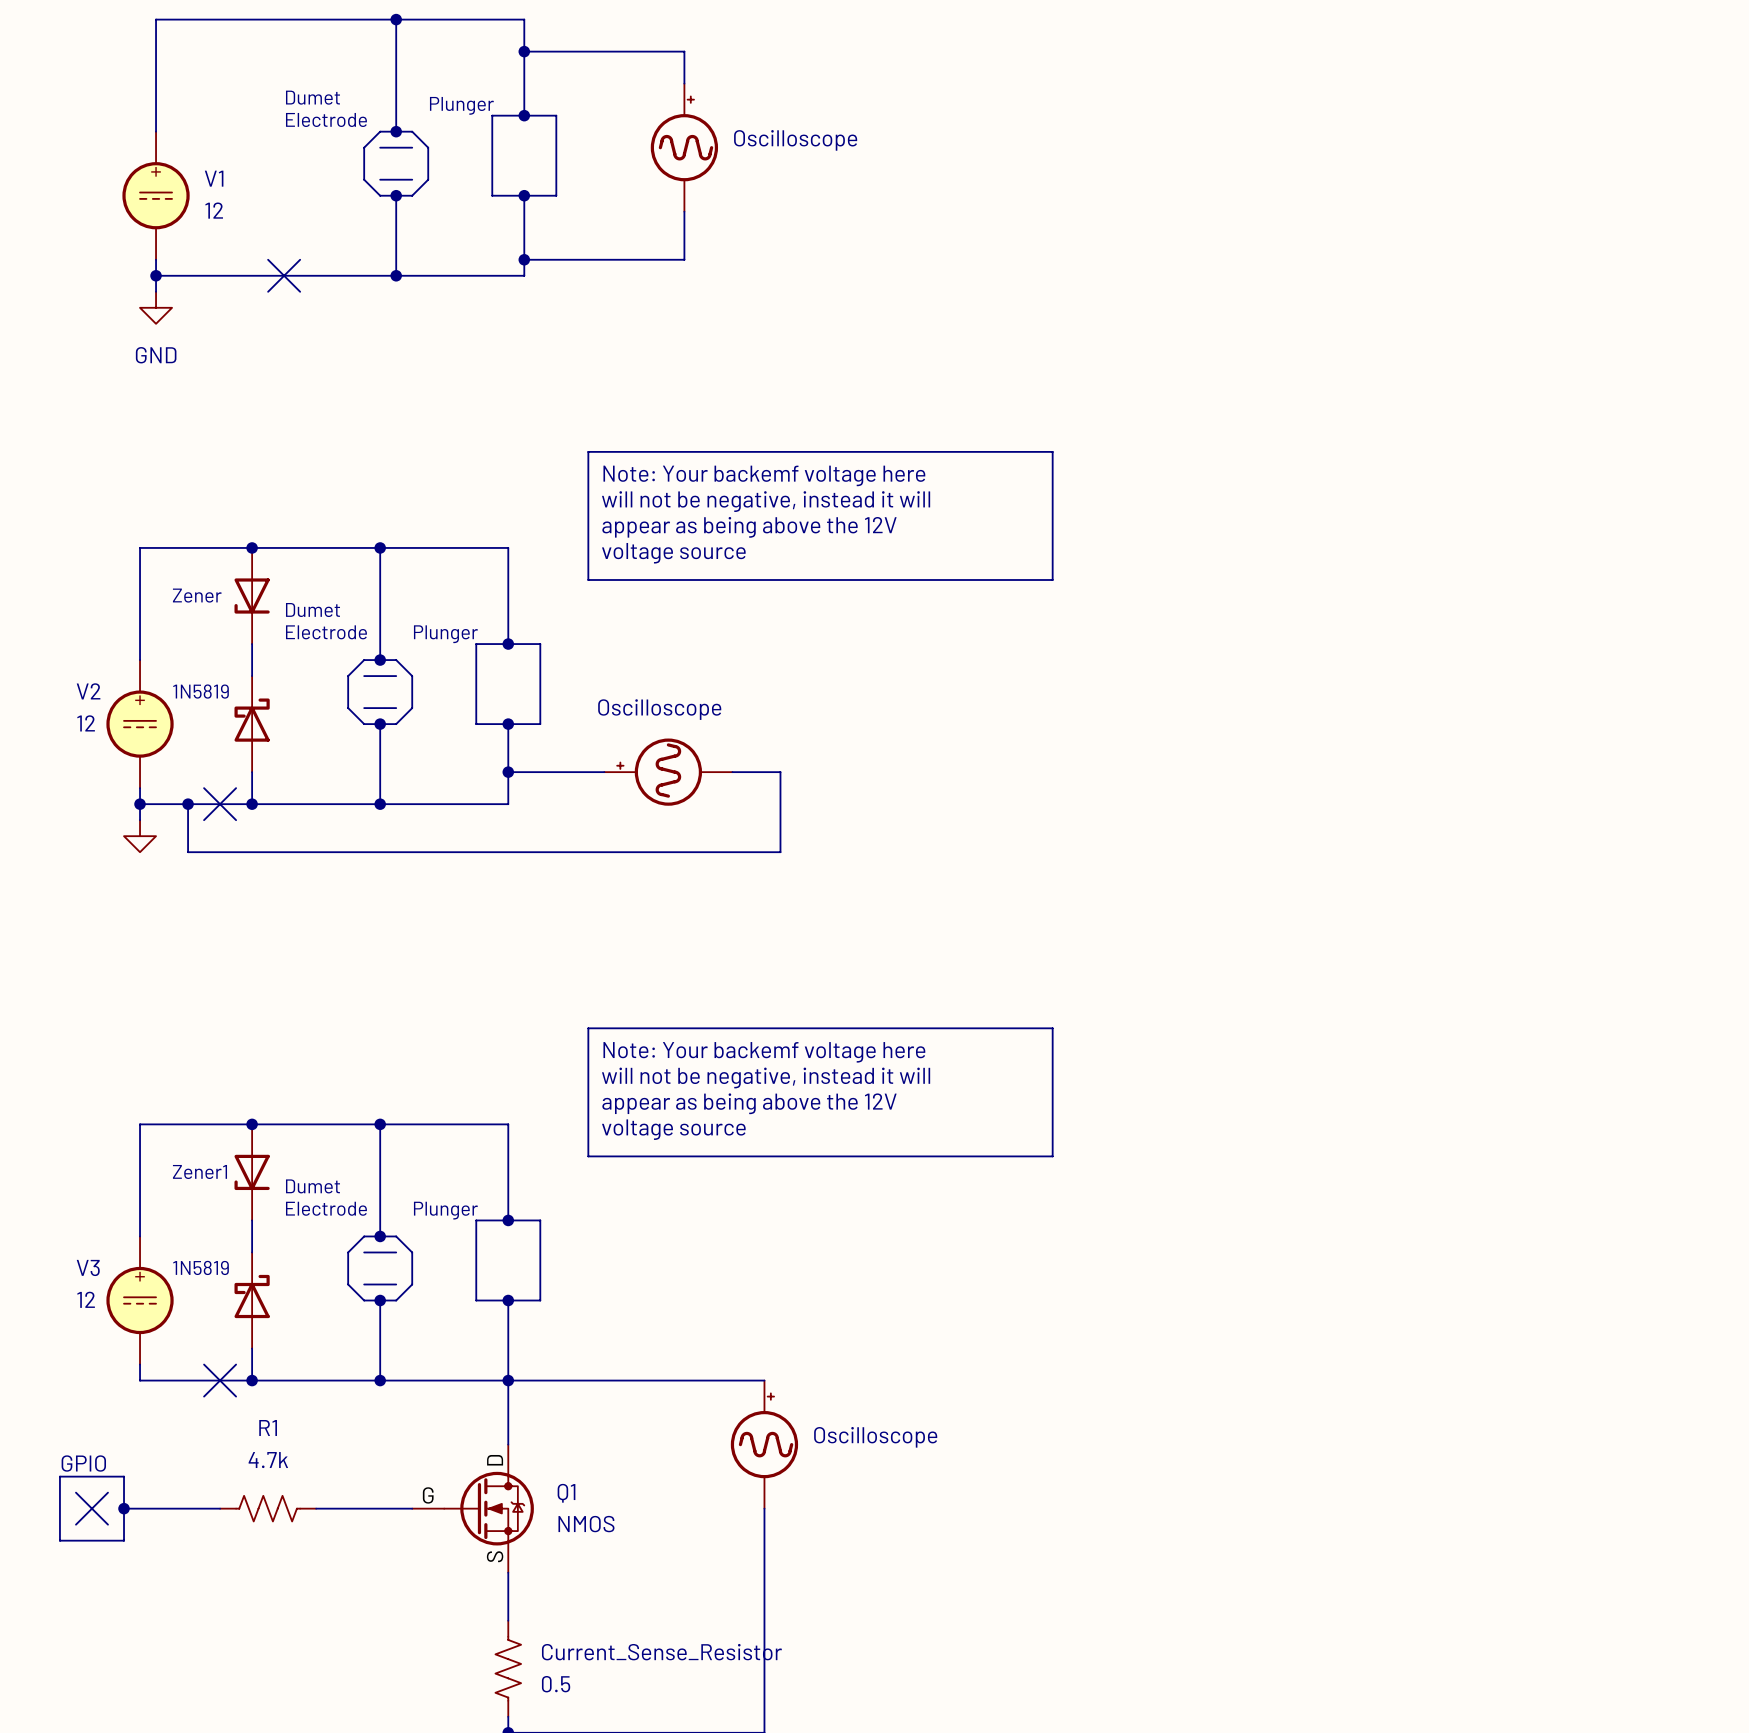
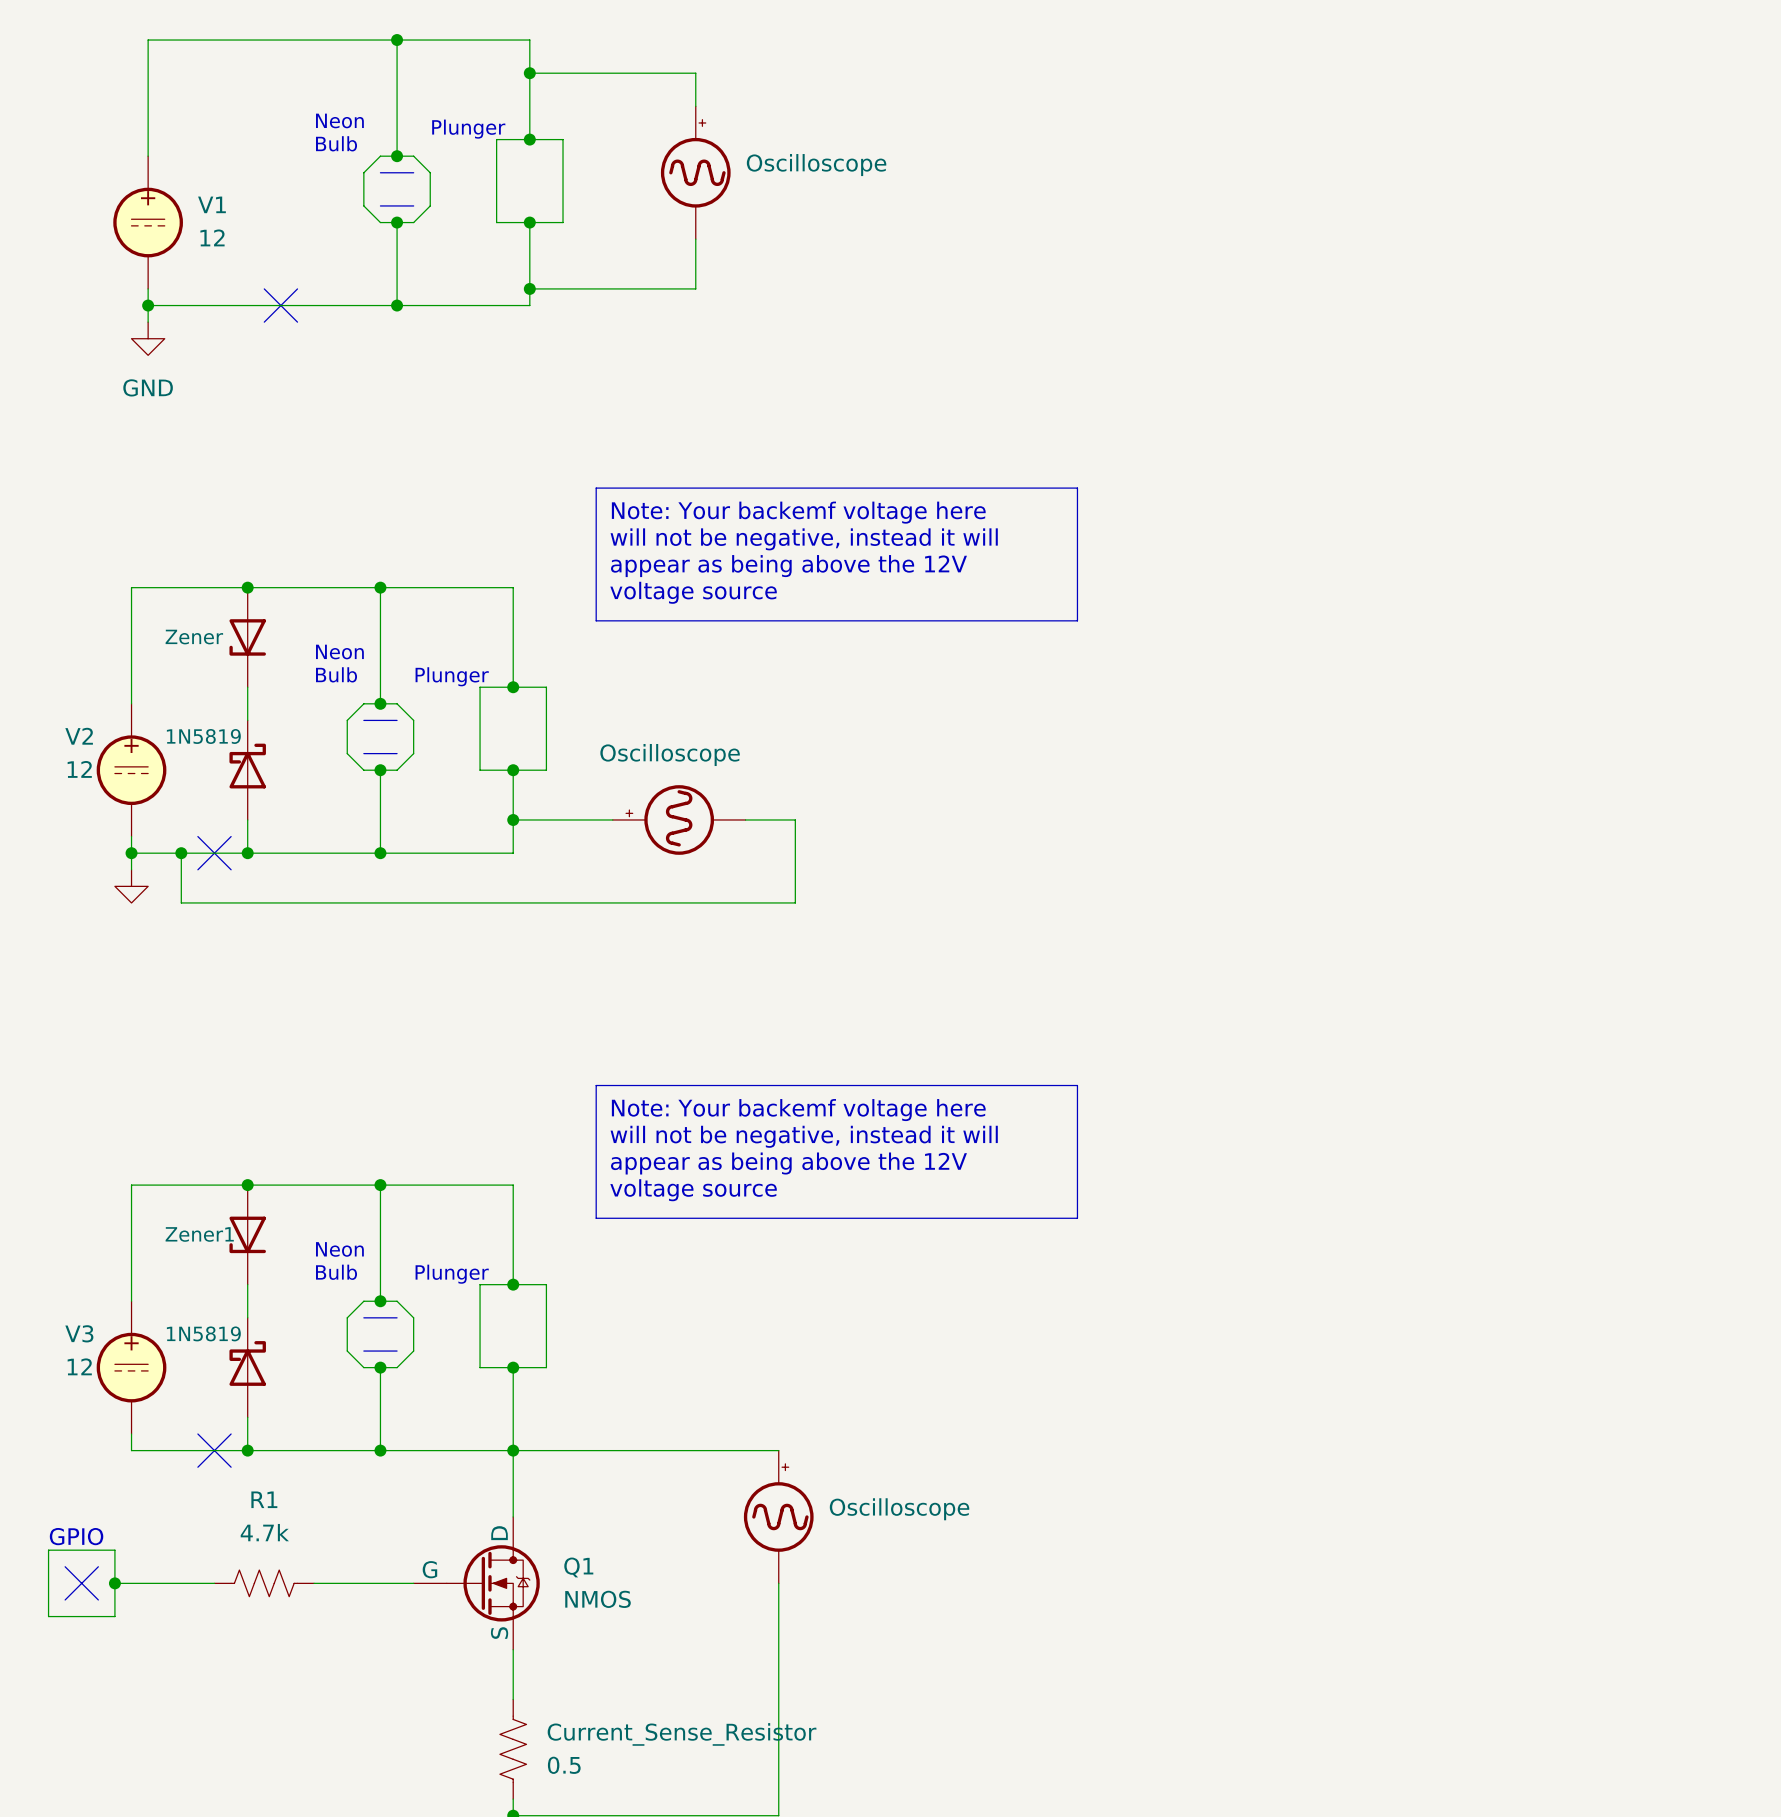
text: Dumet (313, 97) -> none
text: none -> Neon (339, 120)
text: Electrode (326, 119) -> none
text: none -> Bulb (336, 143)
text: Dumet (313, 610) -> none
text: none -> Neon (339, 652)
text: Electrode (326, 632) -> none
text: none -> Bulb (336, 674)
text: Dumet (313, 1186) -> none
text: none -> Neon (339, 1249)
text: Electrode (326, 1208) -> none
text: none -> Bulb (336, 1272)

